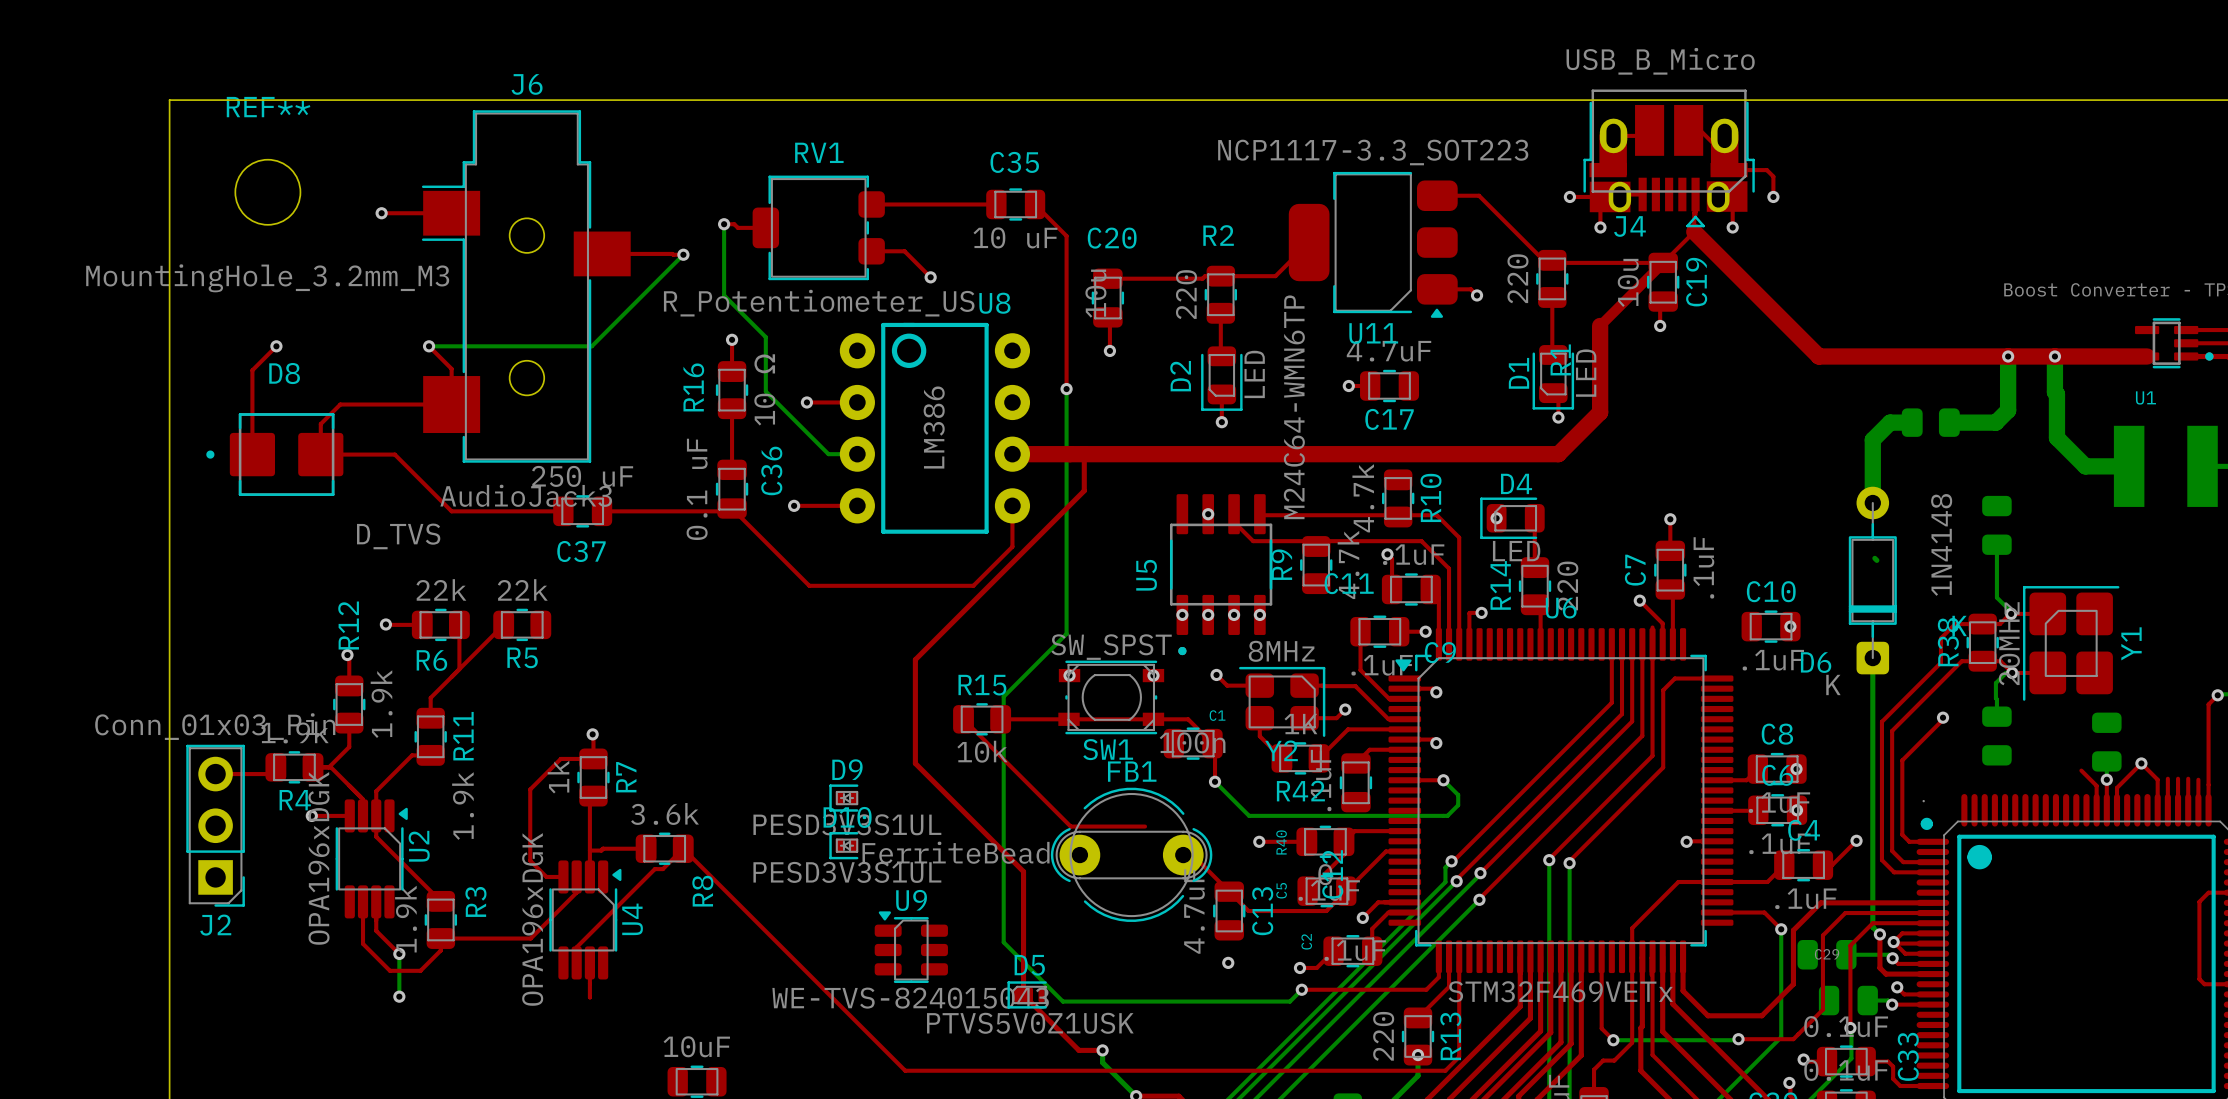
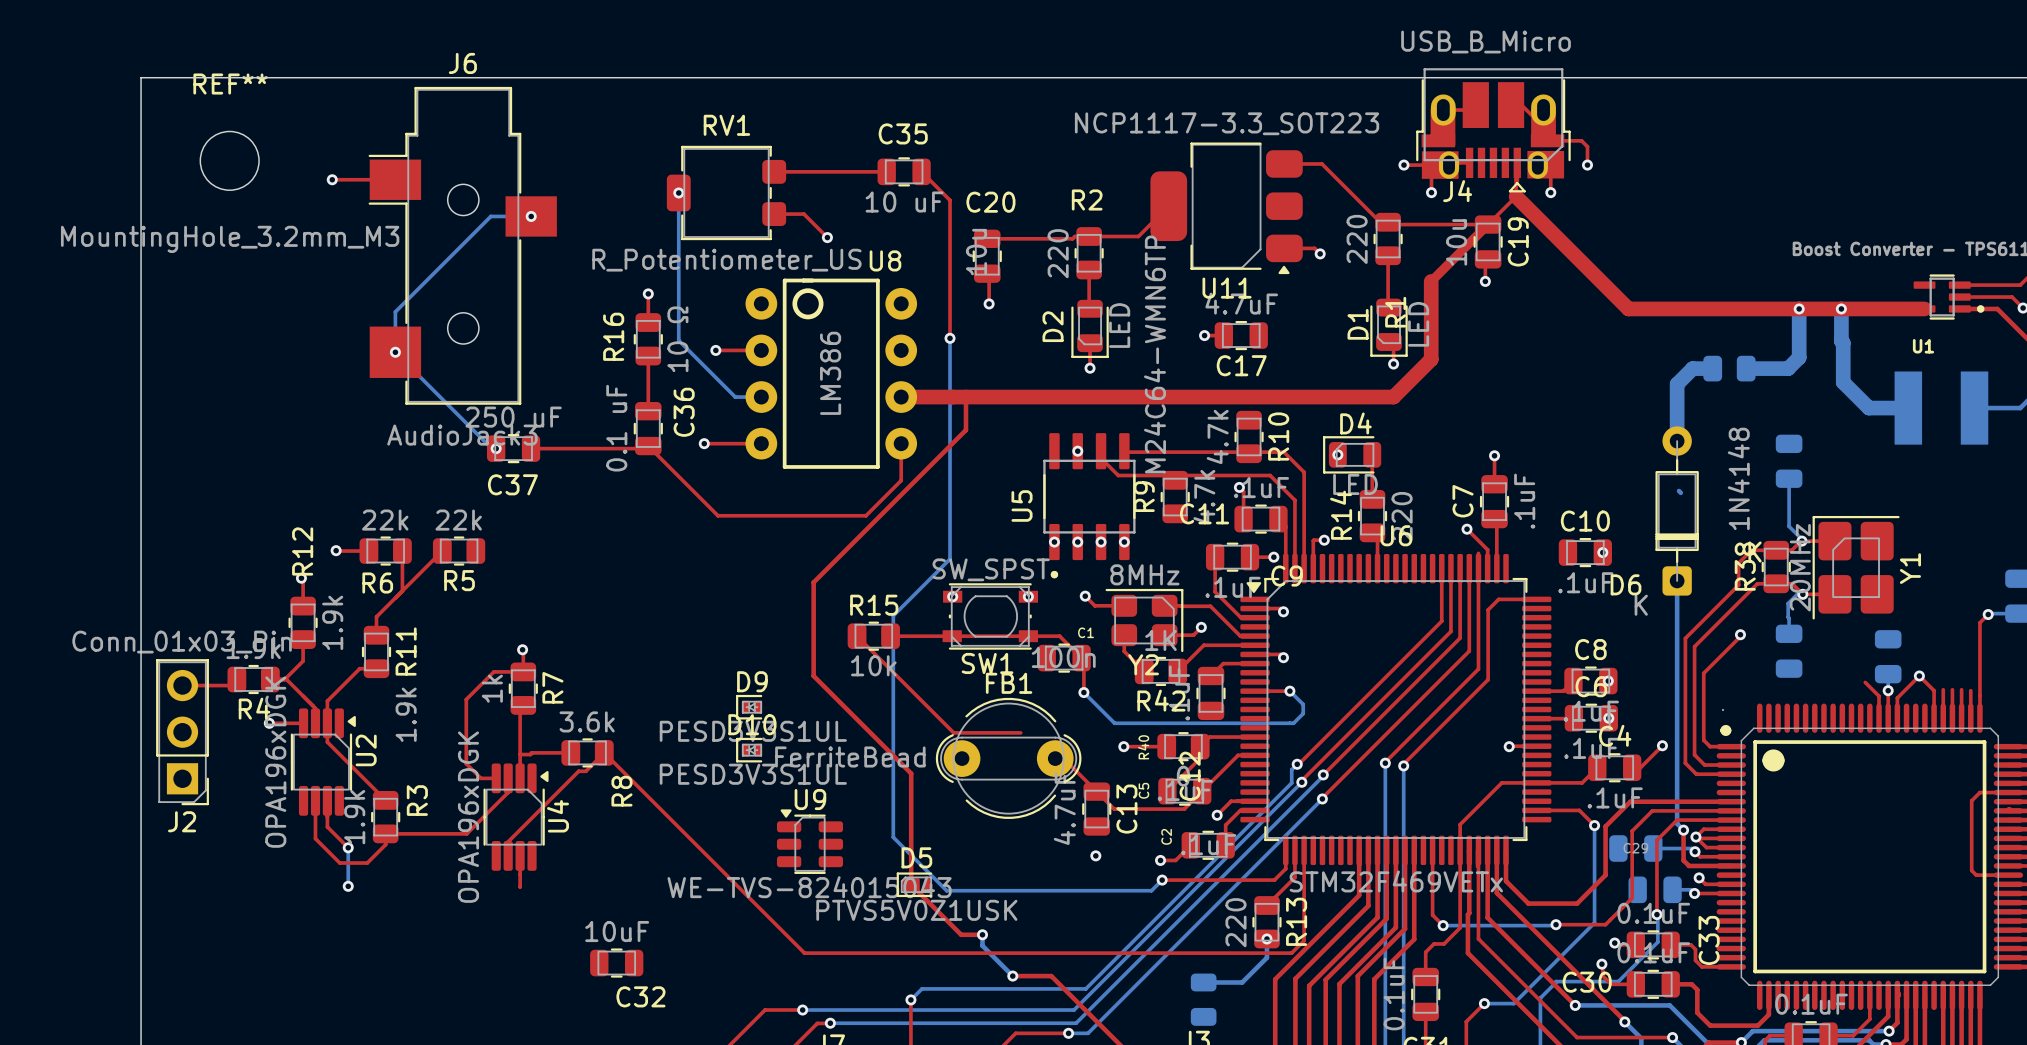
top track: (724, 224) (734, 224) (737, 227) (765, 227) -> none
bottom track: (724, 224) (724, 295) (765, 337) -> (678, 192) (678, 291)
via position: (724, 224) -> (678, 192)
top track: (602, 253) (683, 254) -> none
bottom track: none -> (531, 216) (490, 216) (395, 311) (395, 352) (491, 448)
via: none -> (531, 216)
bottom track: (683, 254) (591, 346) (429, 346) -> none
via: (683, 254) -> none
top track: (276, 346) (252, 370) (252, 454) -> none
via: (276, 346) -> none
top track: (429, 346) (451, 368) (451, 404) (340, 404) (320, 424) (320, 454) (394, 454) (451, 511) (563, 511) -> none
via position: (429, 346) -> (395, 352)
D8: D_TVS (274, 454) -> none
via: none -> (496, 448)

